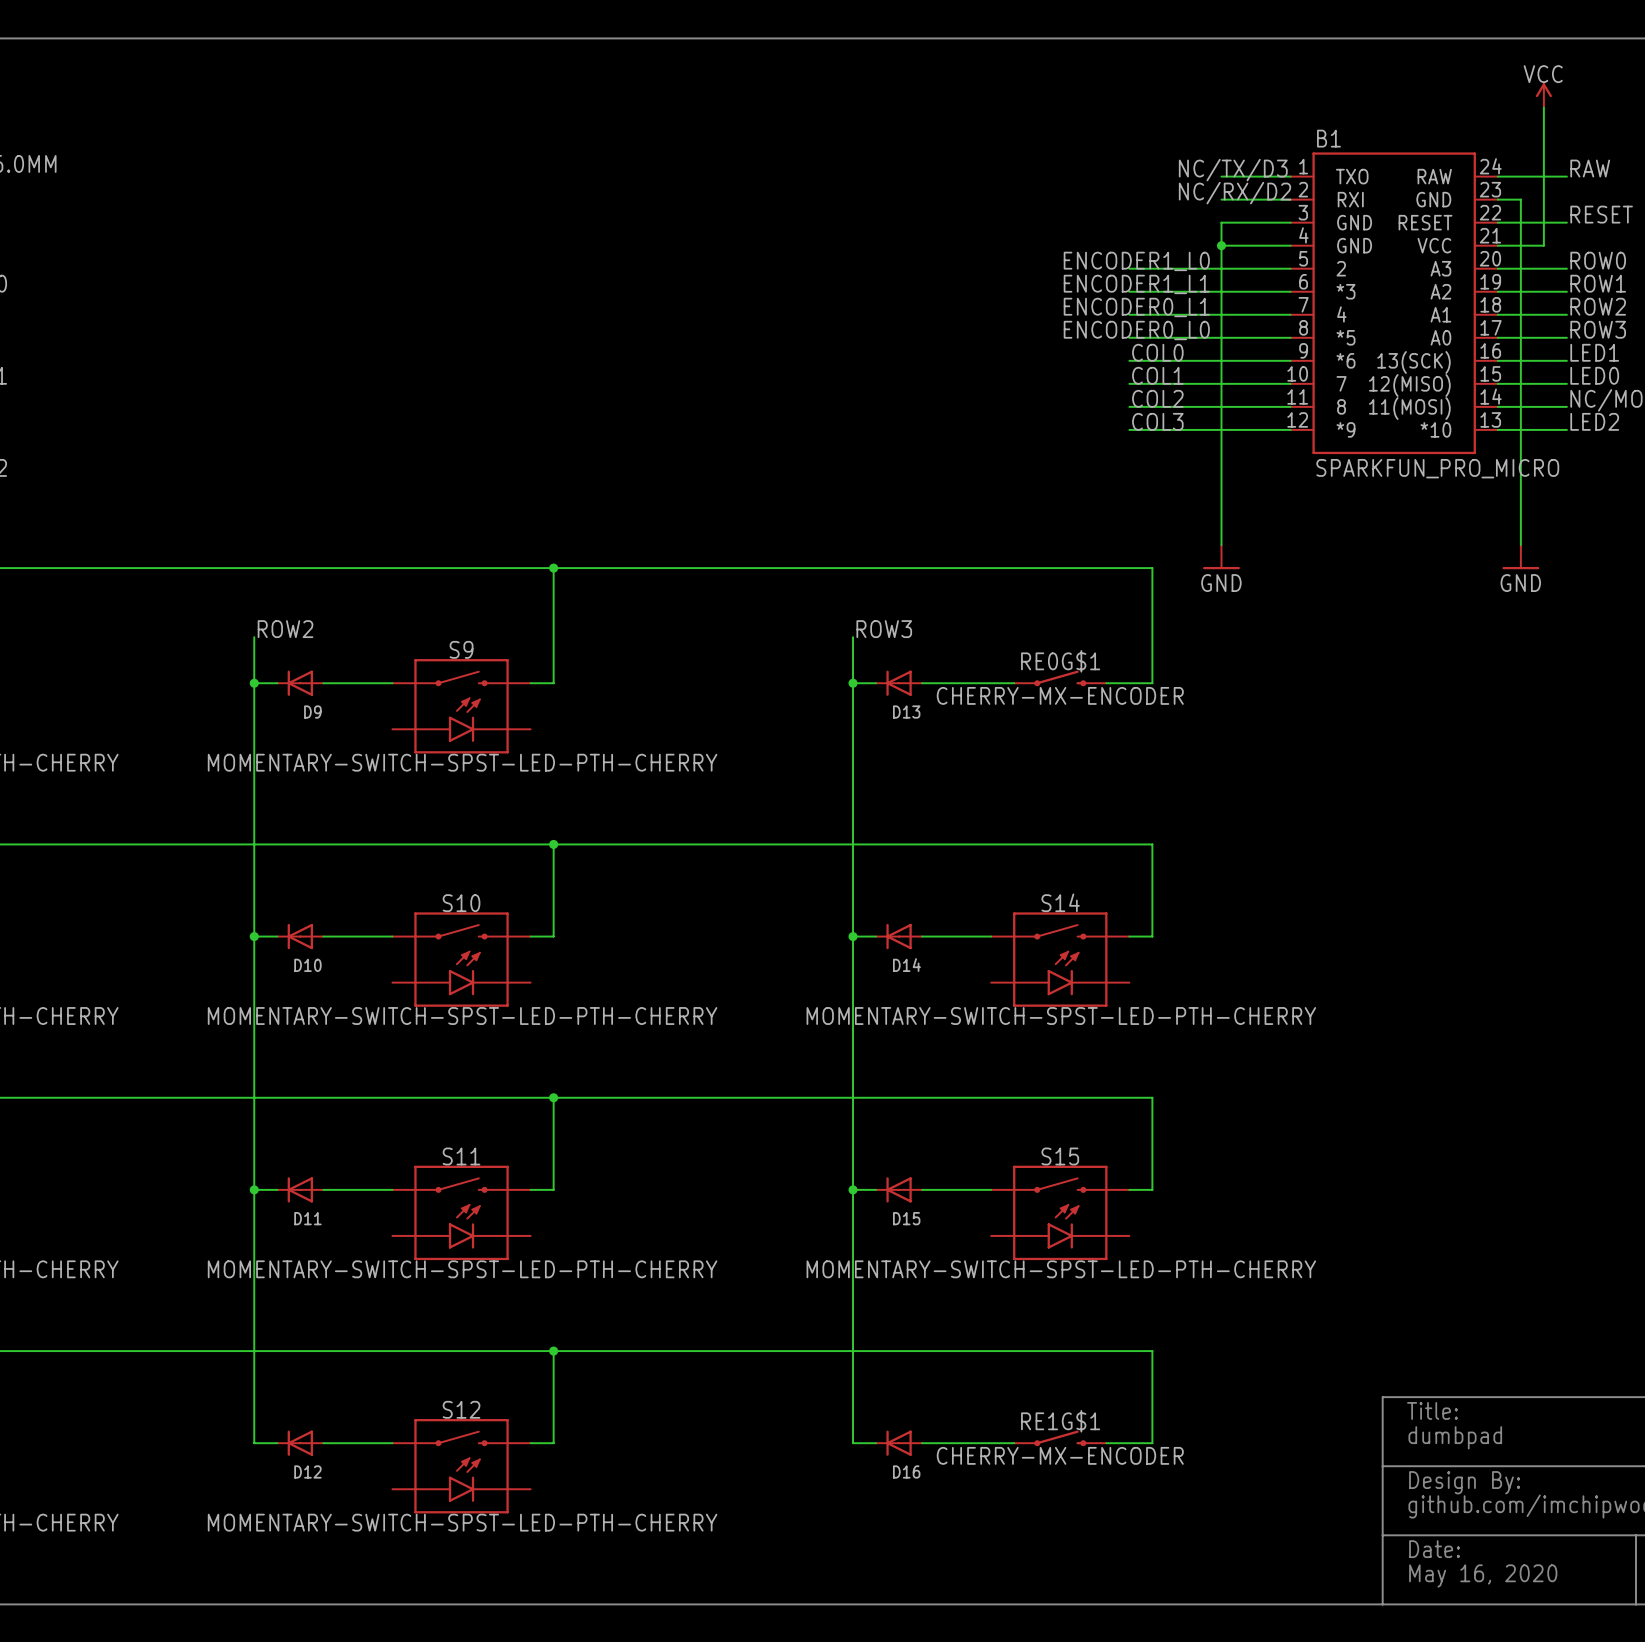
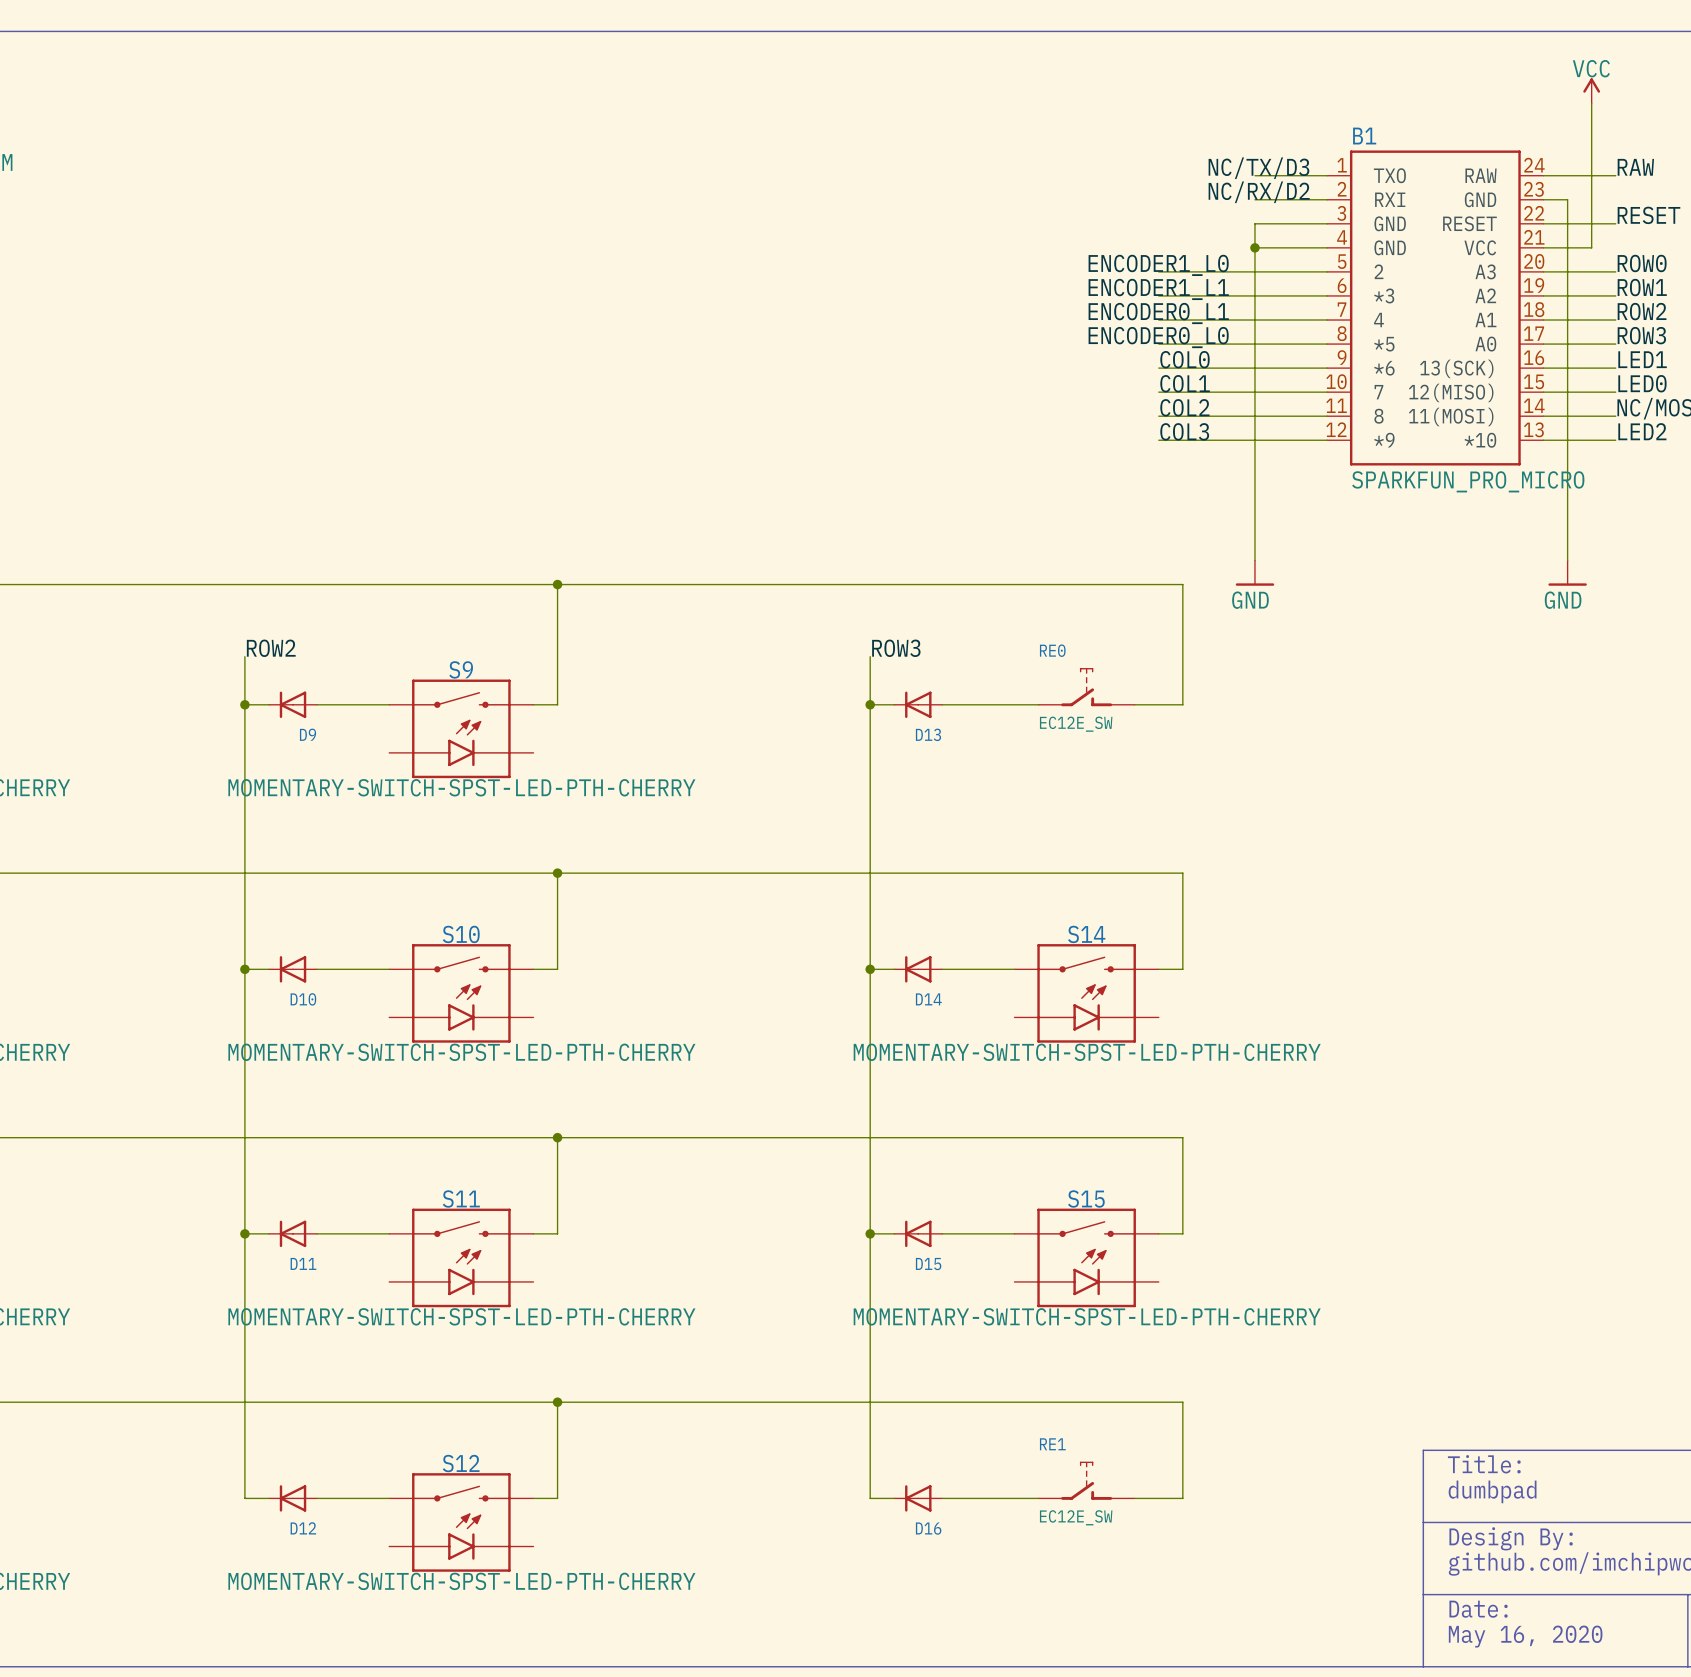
RE0: none -> EC12E_SW (1086, 687)
RE0G$1: CHERRY-MX-ENCODER (1060, 678) -> none
RE1: none -> EC12E_SW (1086, 1480)
RE1G$1: CHERRY-MX-ENCODER (1060, 1438) -> none

